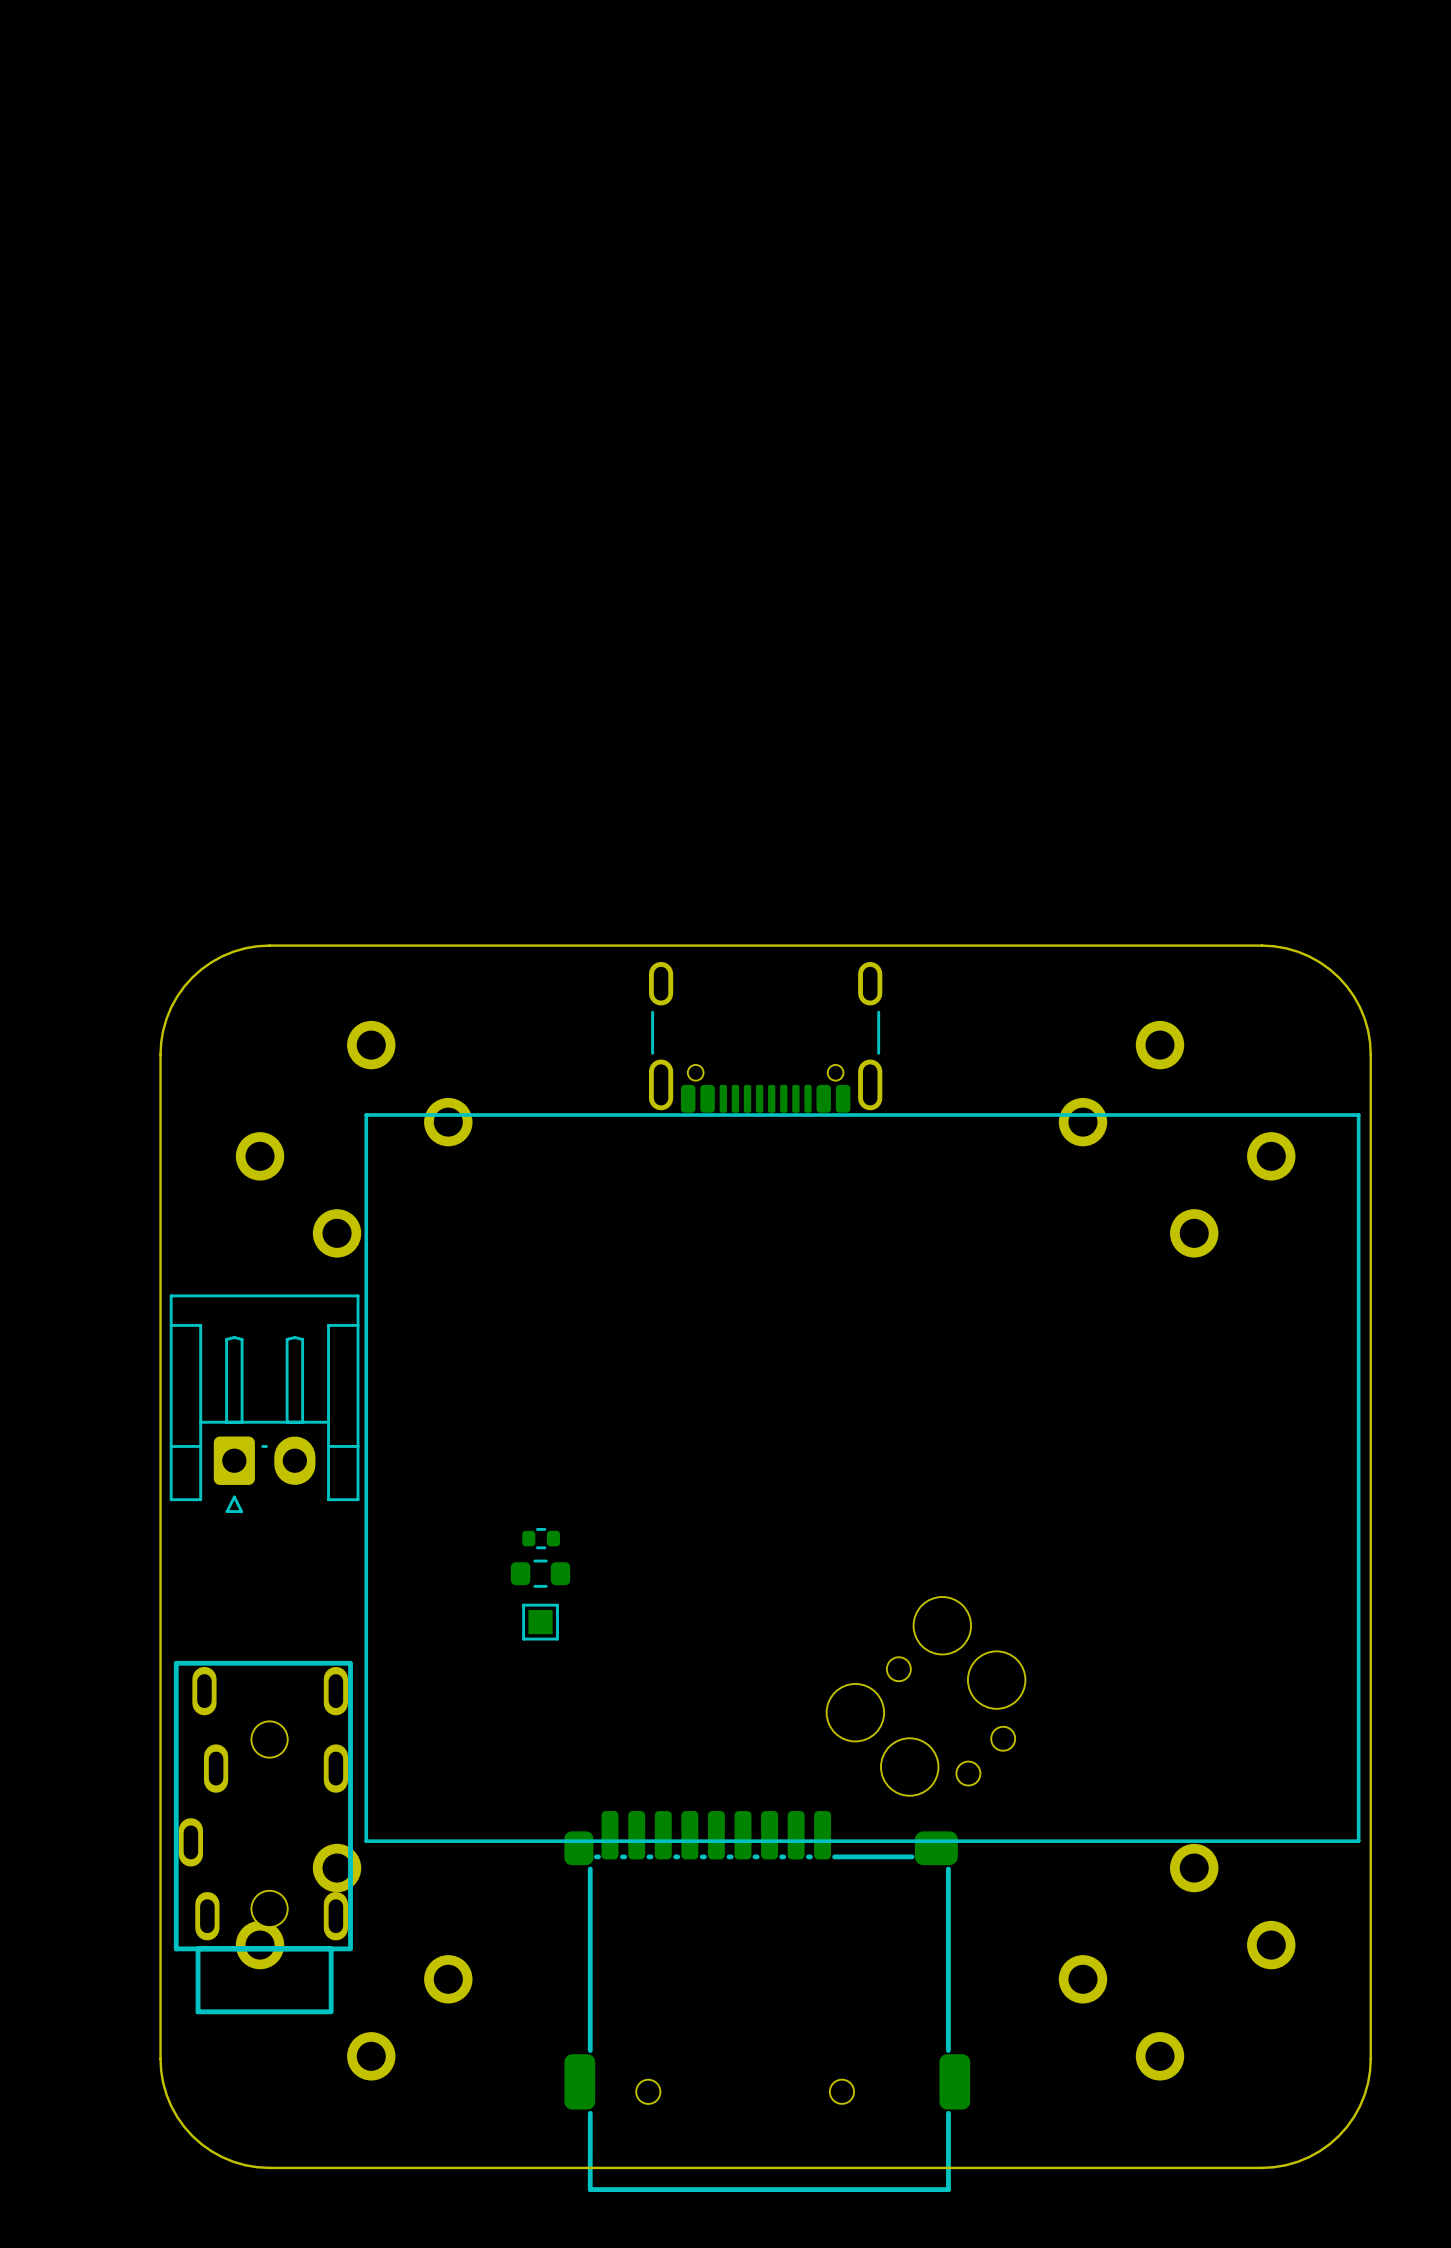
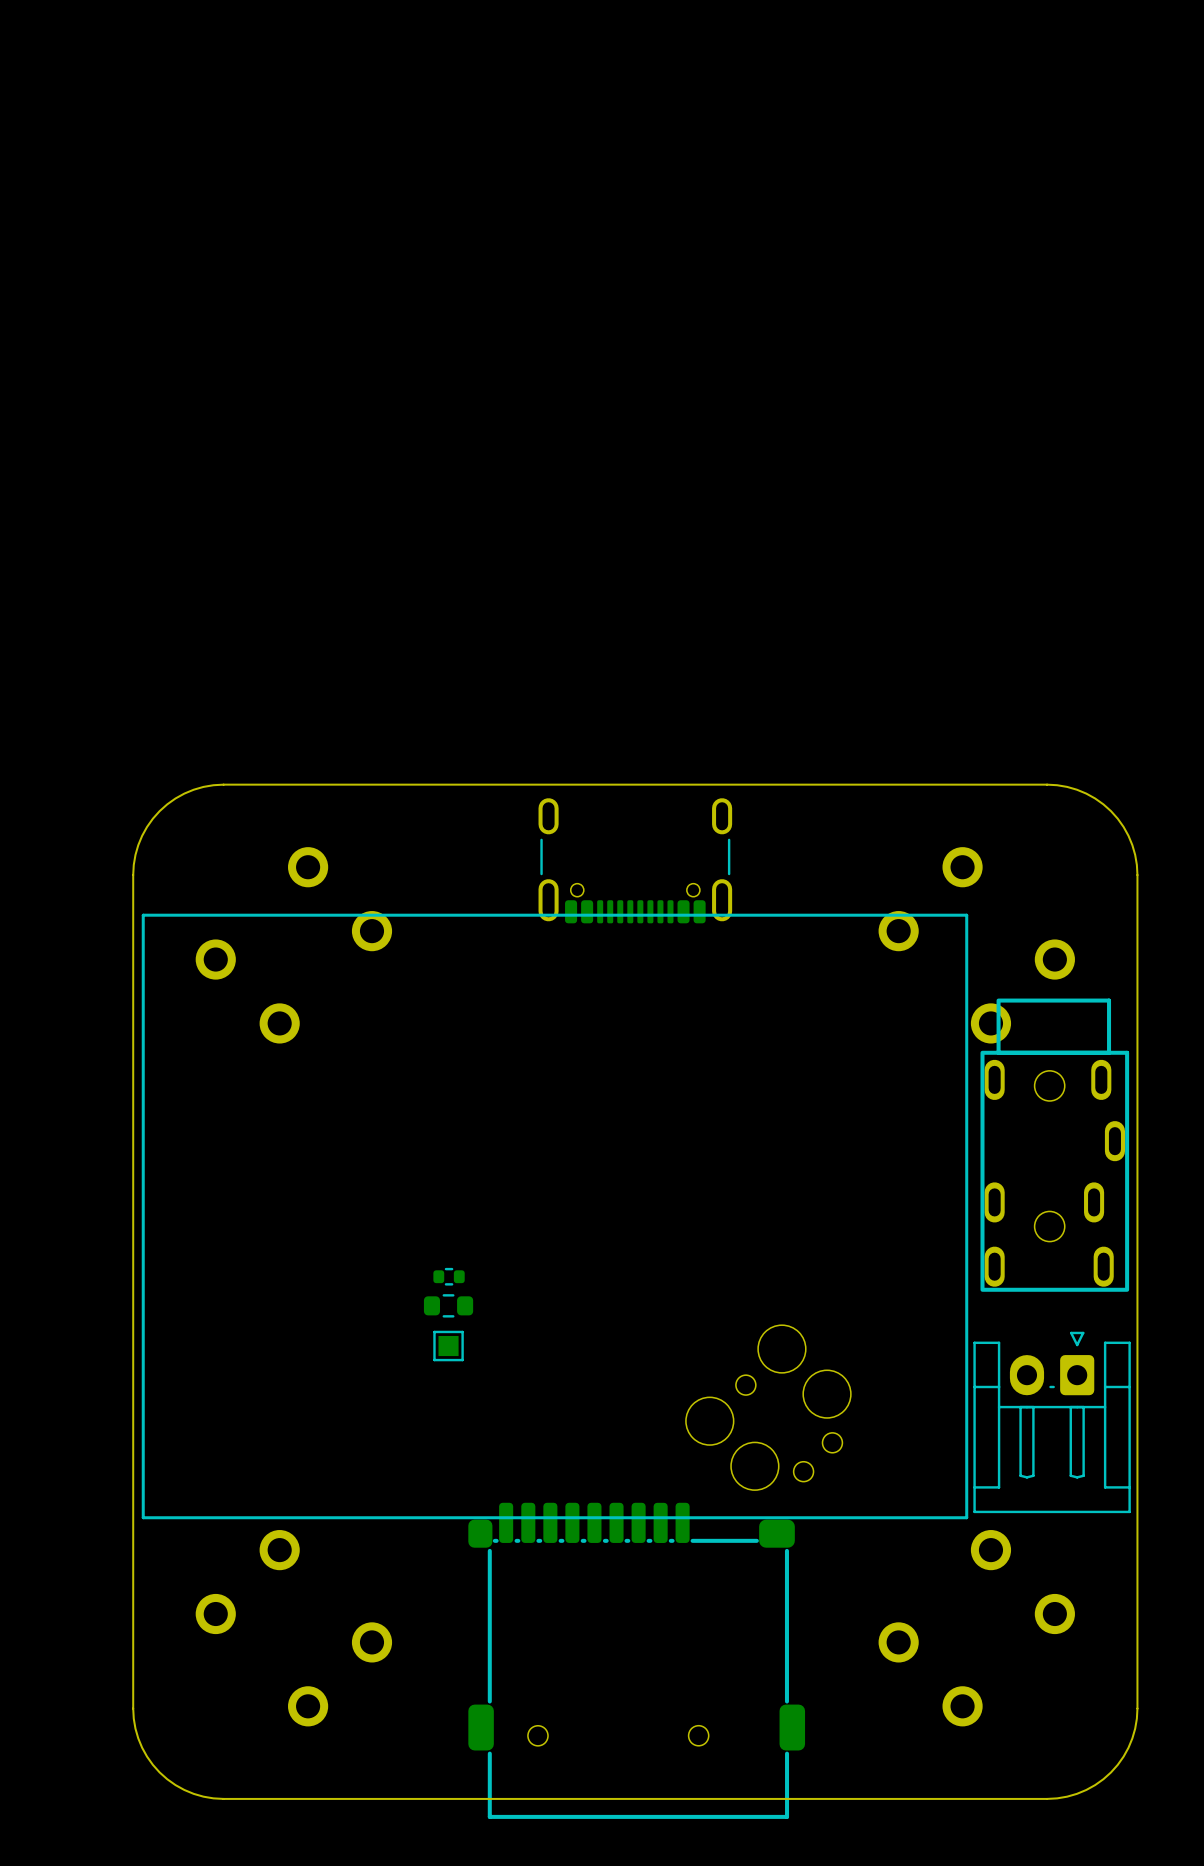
line: (1358, 1115) (366, 1115) (366, 1841) (1358, 1841) (1358, 1115) -> (966, 915) (966, 1517) (143, 1517) (143, 915) (966, 915)
part: none -> (1054, 1145)
part: (264, 1403) -> none
part: none -> (1052, 1422)
part: (263, 1837) -> none

